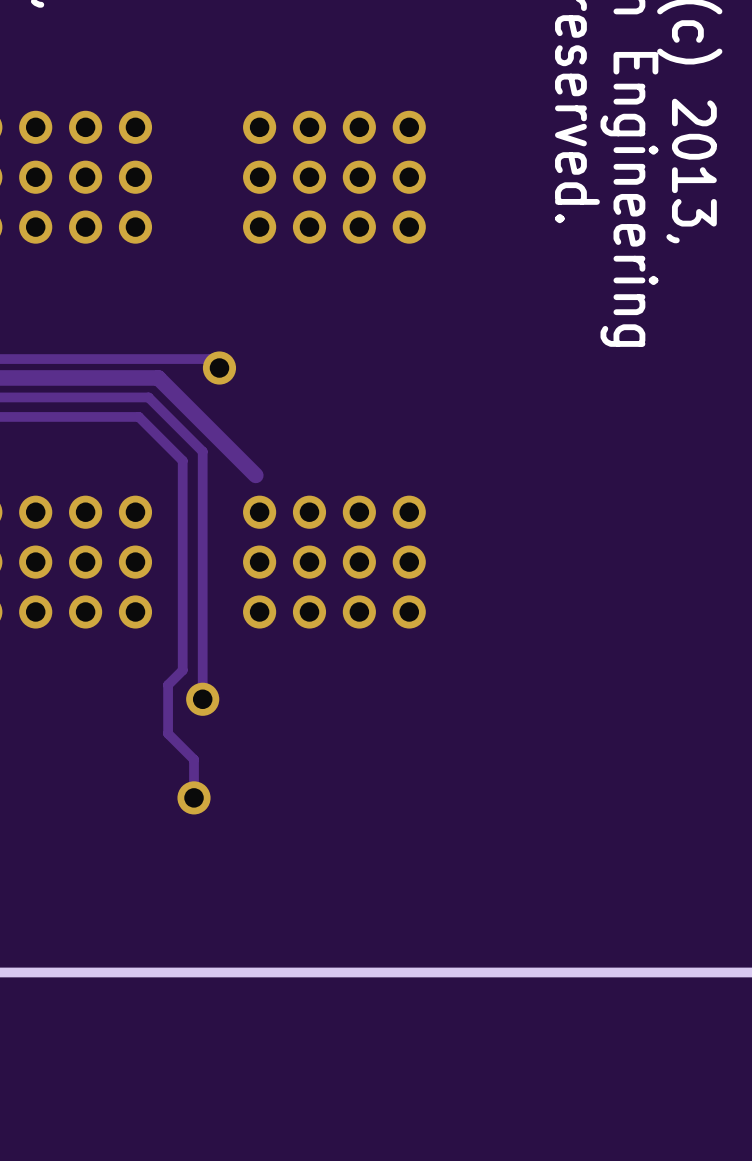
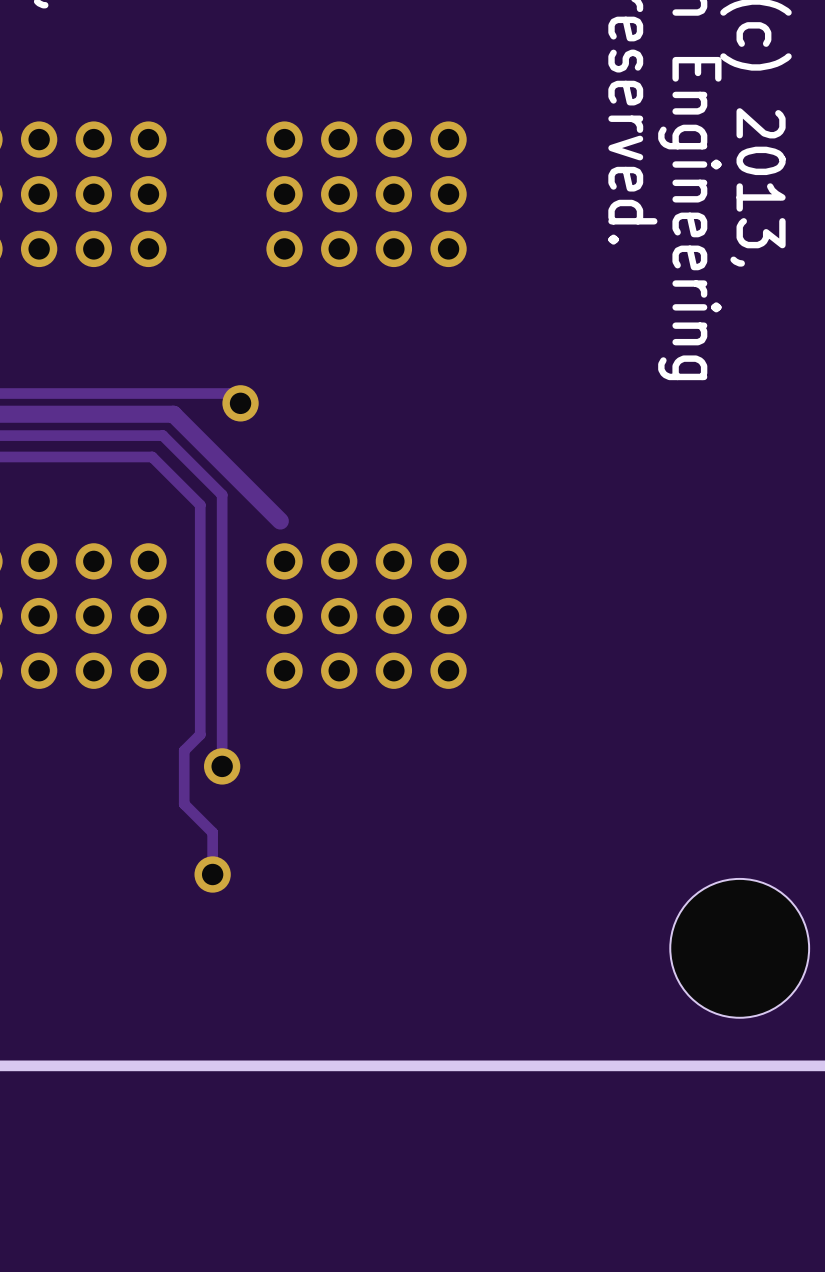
part: none -> (739, 948)

